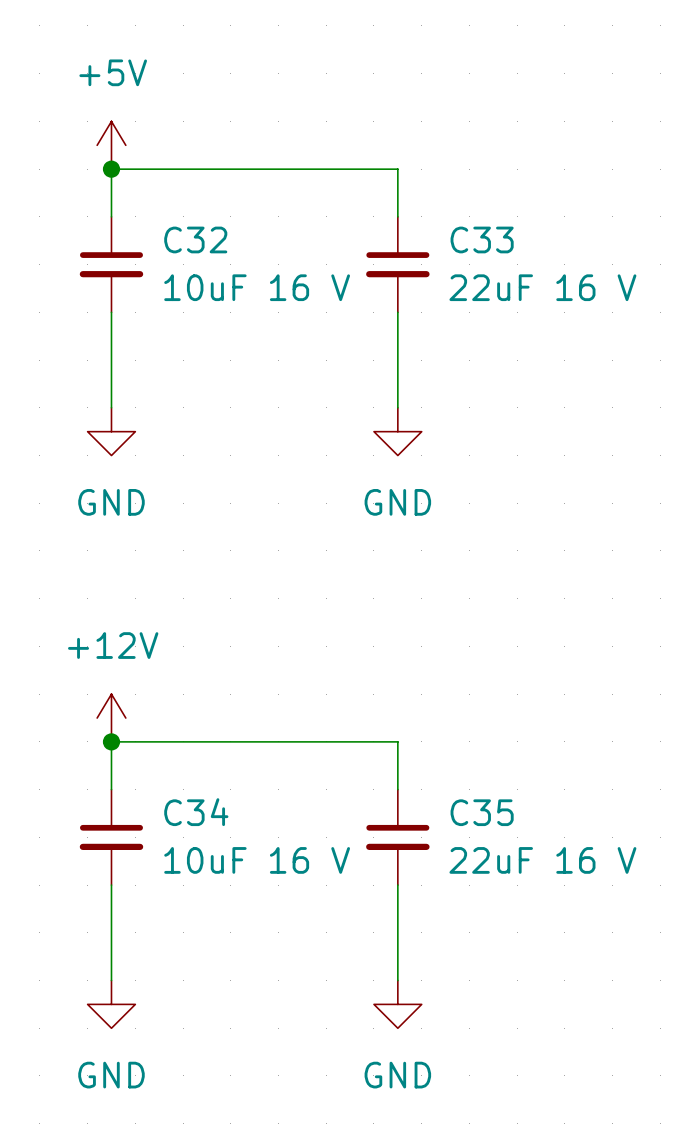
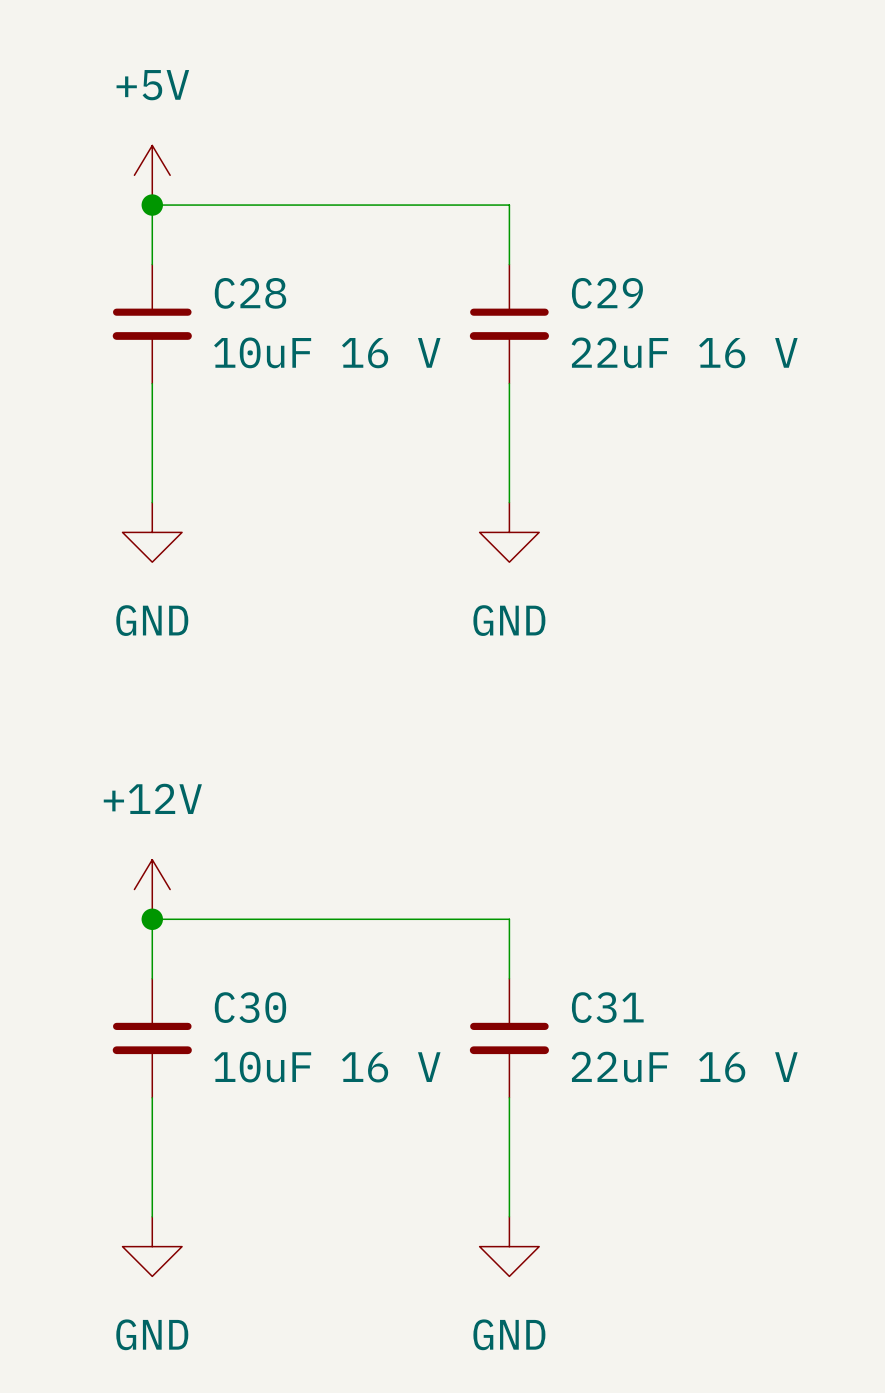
C32 name: C32 (195, 239) -> C28 (250, 293)
C33 name: C33 (482, 239) -> C29 (607, 293)
C34 name: C34 (196, 812) -> C30 (250, 1007)
C35 name: C35 (482, 812) -> C31 (607, 1007)

